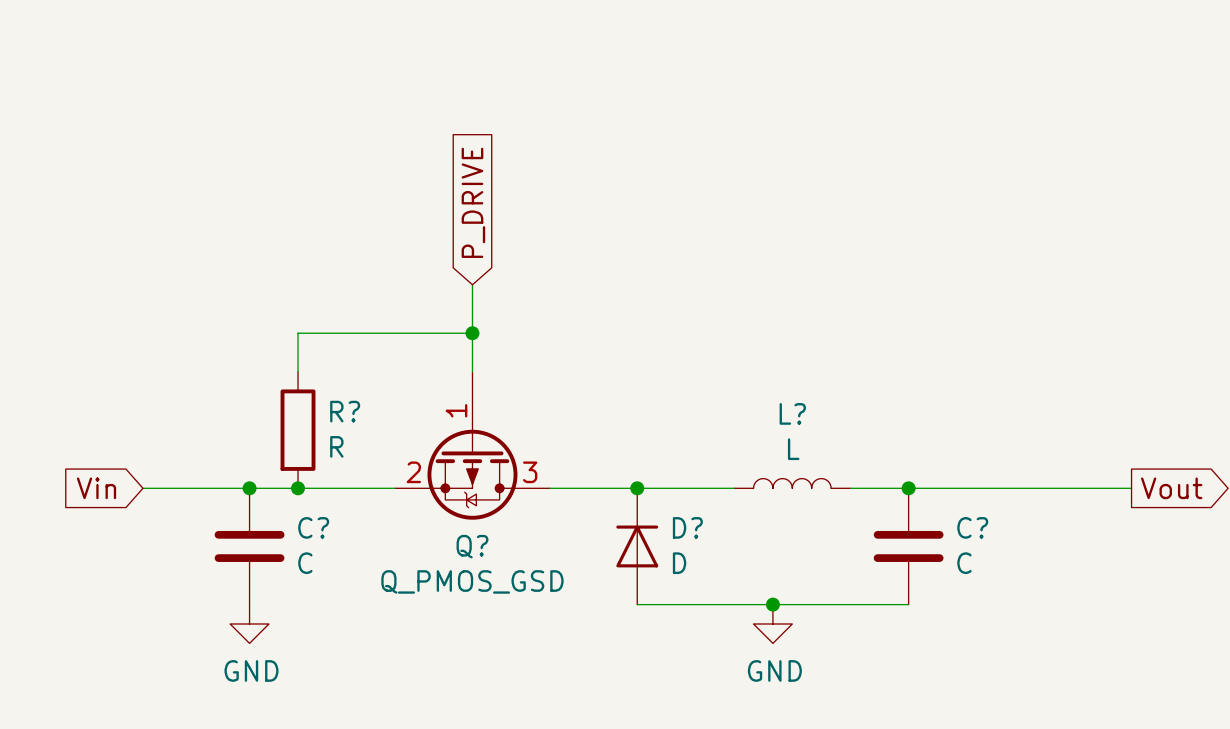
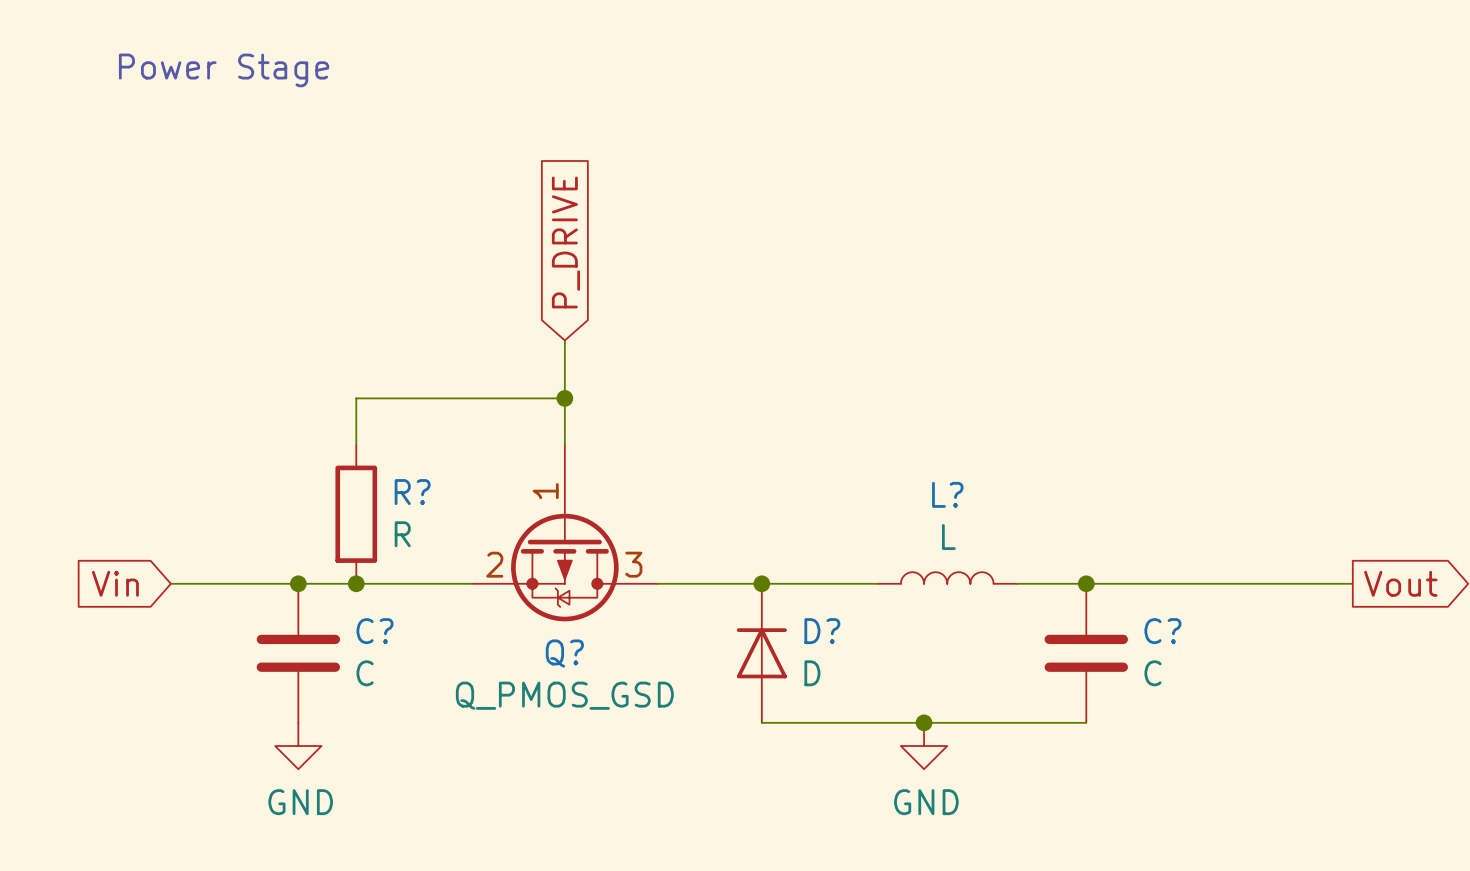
text: none -> Power Stage (224, 70)

